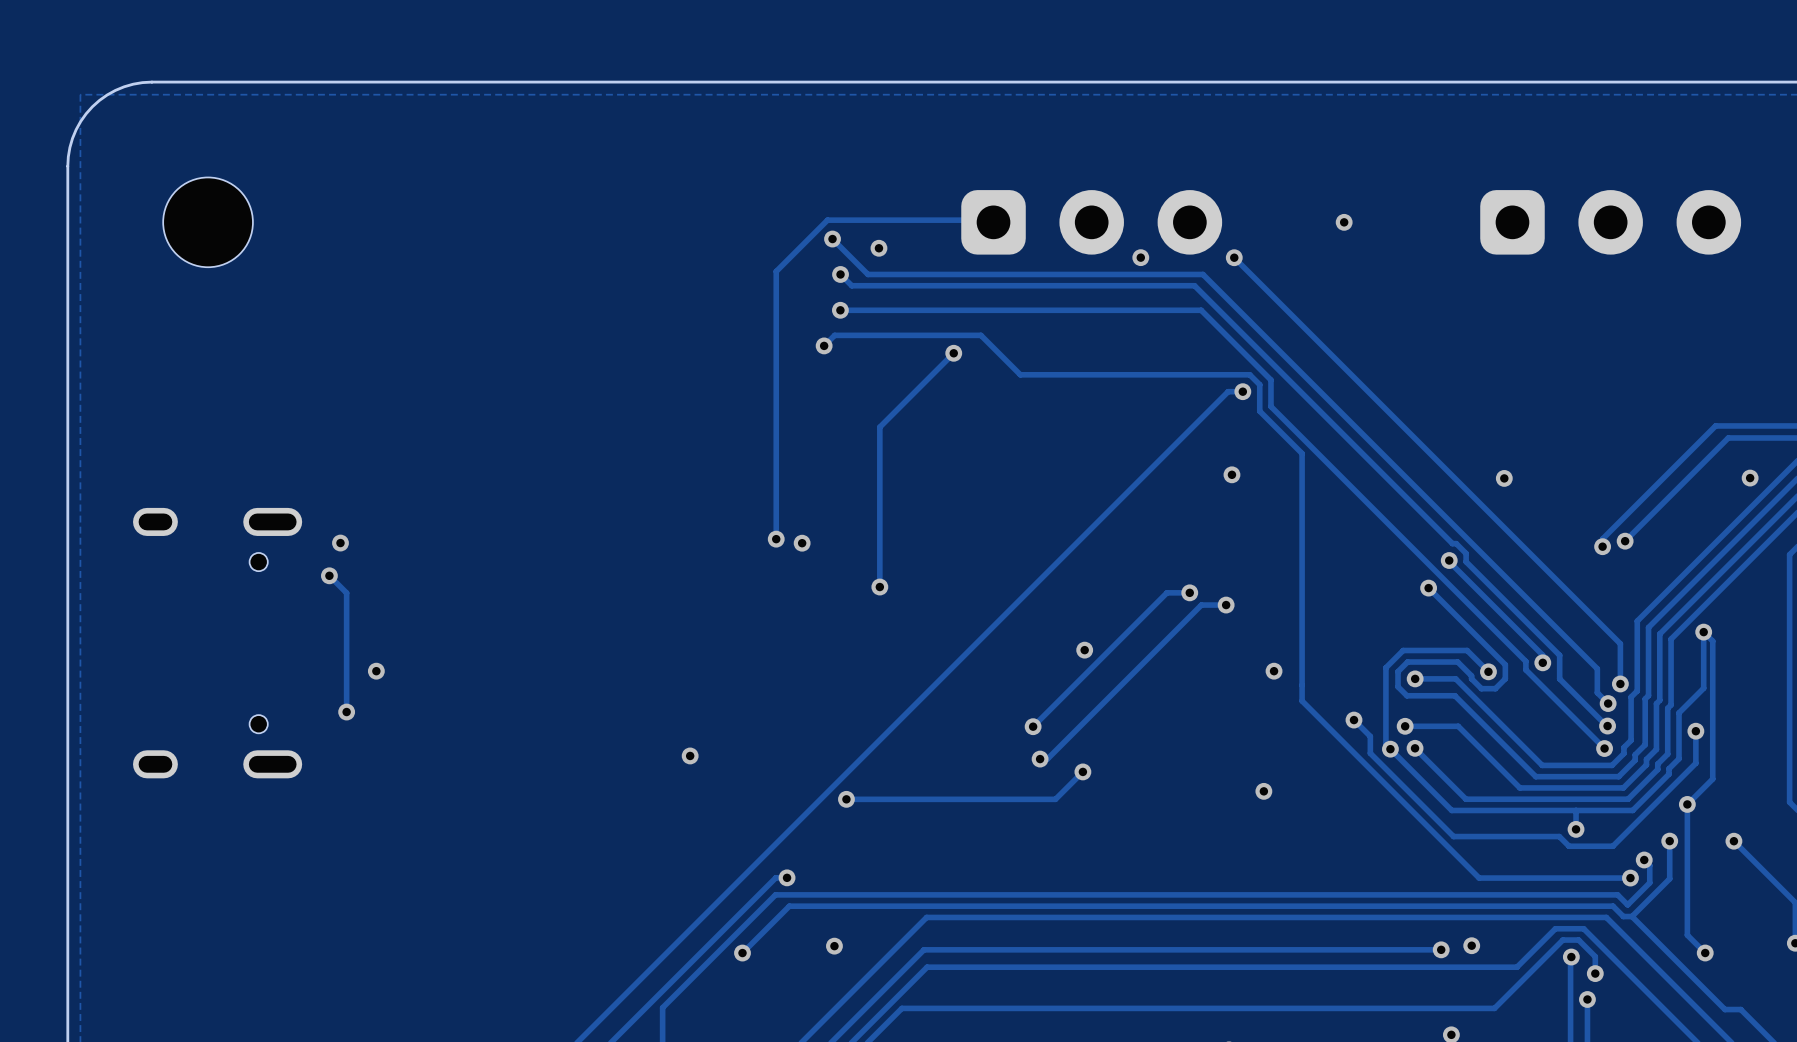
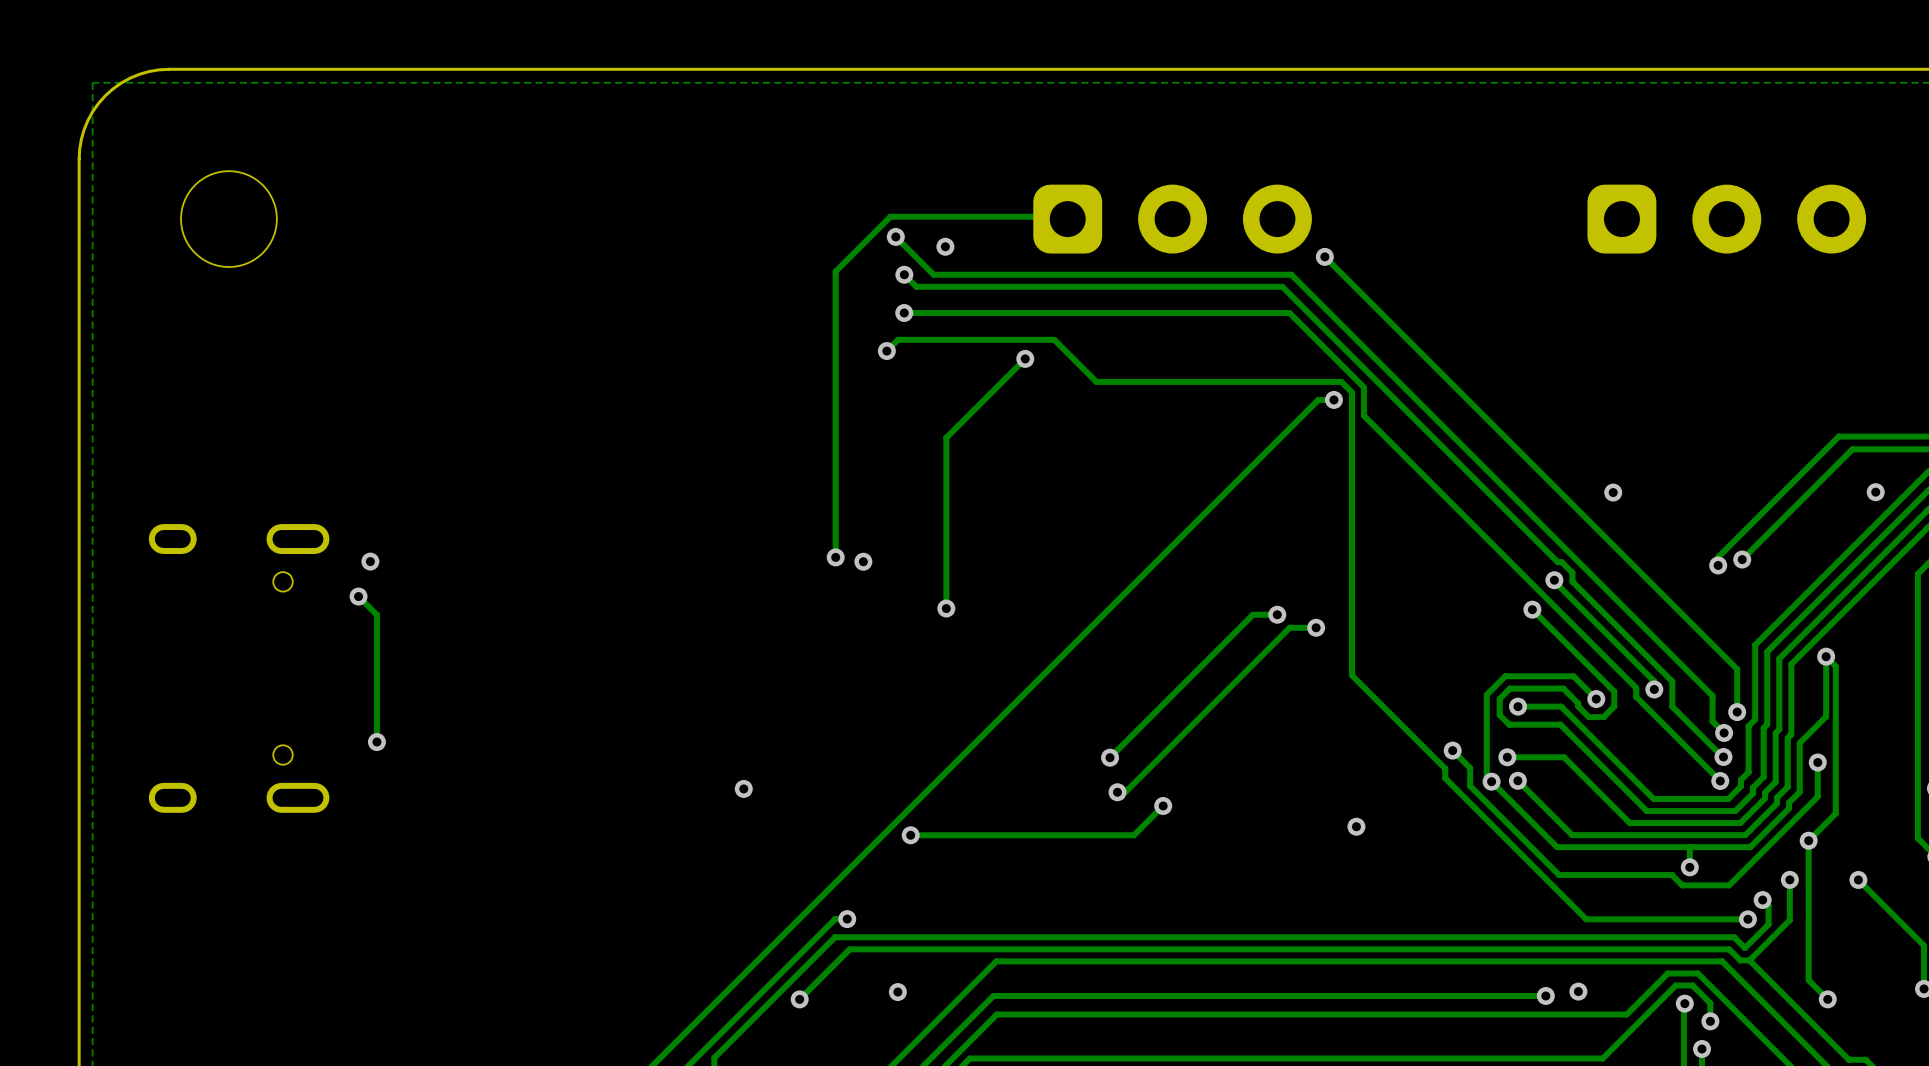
via: (1344, 222) -> none
via: (1140, 257) -> none
track: (1259, 411) (1302, 453) (1302, 700) (1347, 745) -> (1352, 420) (1352, 675) (1445, 768) (1445, 778)
via: (1231, 474) -> none
via: (1084, 650) -> none
via: (376, 671) -> none
via: (1274, 671) -> none

